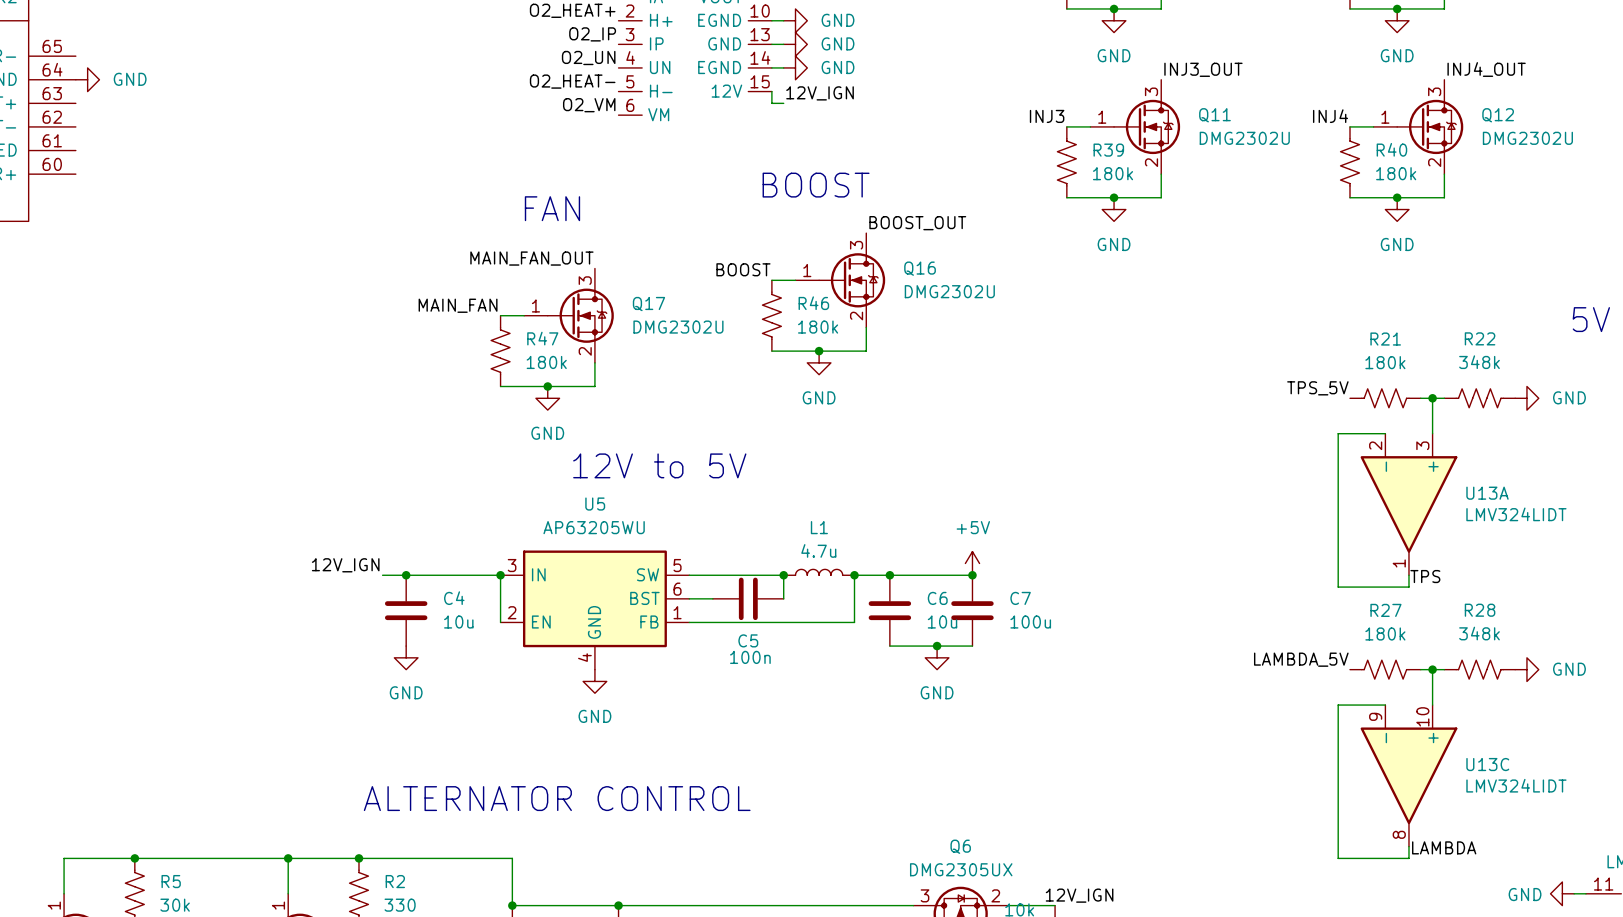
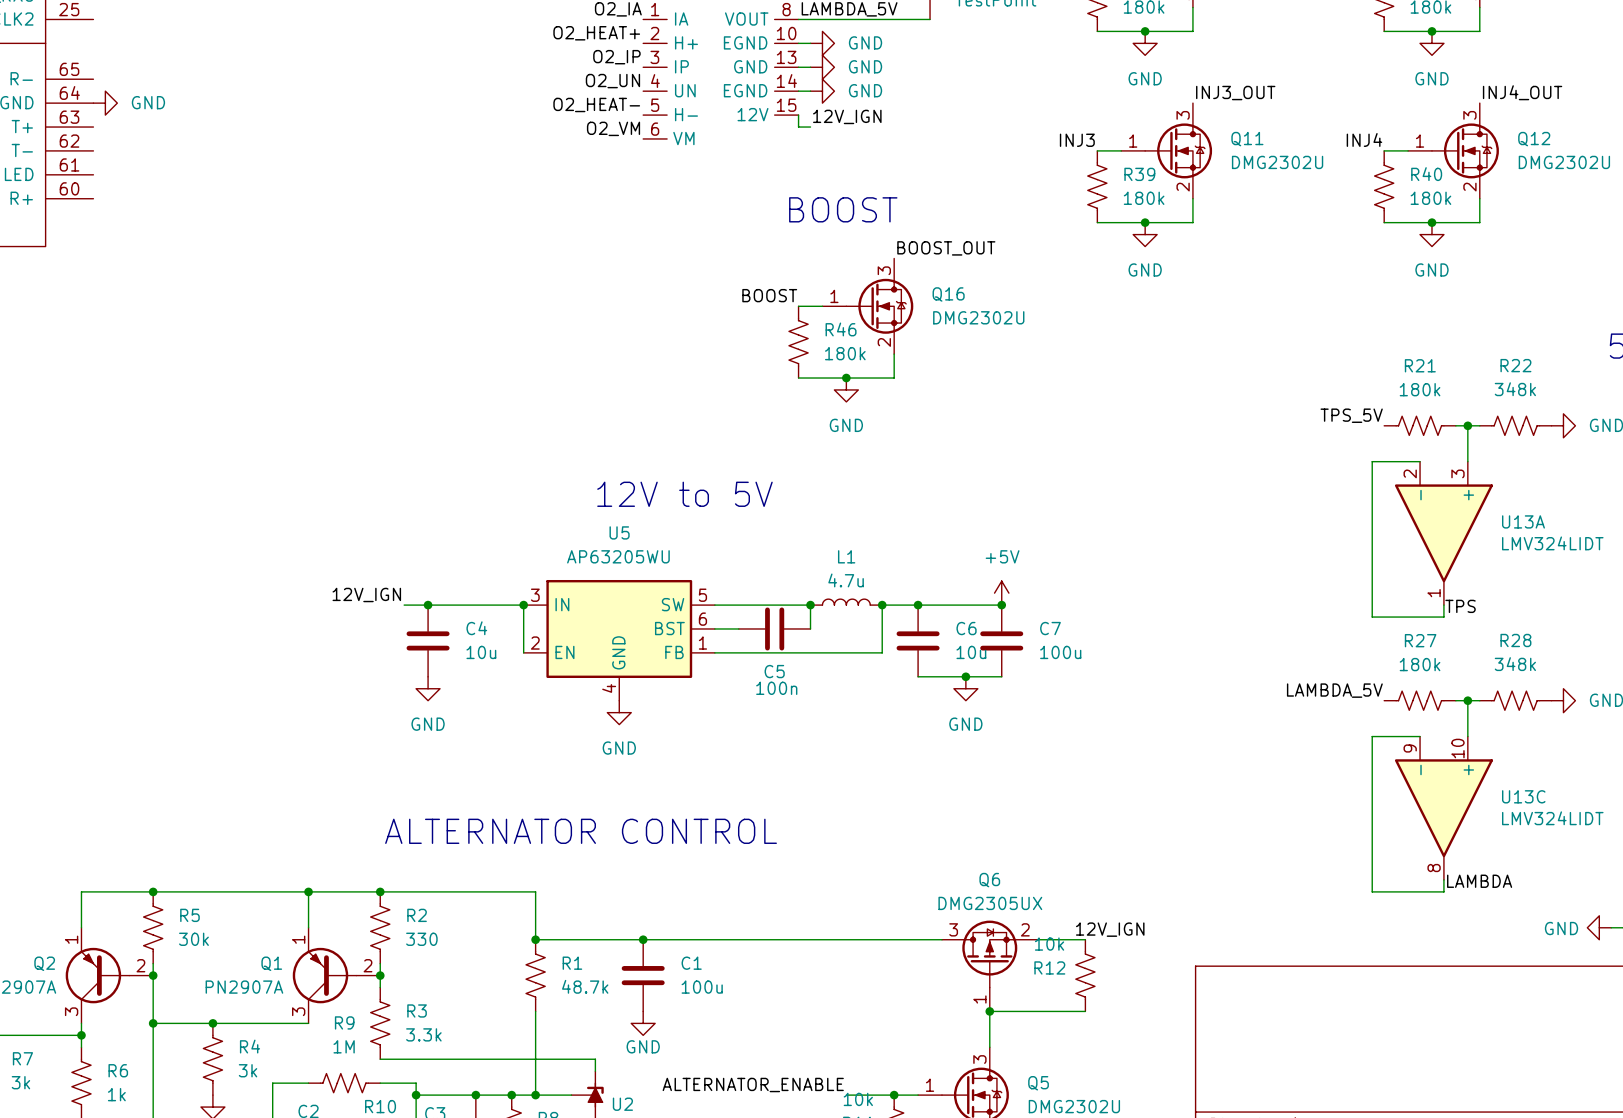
text: FAN (552, 208) -> none
label: MAIN_FAN_OUT (531, 258) -> none
label: MAIN_FAN (458, 305) -> none
wire: (500, 315) (524, 315) -> none
Q17: DMG2302U (568, 315) -> none
R47: 180k (500, 351) -> none
wire: (594, 362) (594, 386) (500, 386) -> none
junction: (547, 386) -> none
power symbol: GND (547, 398) -> none

